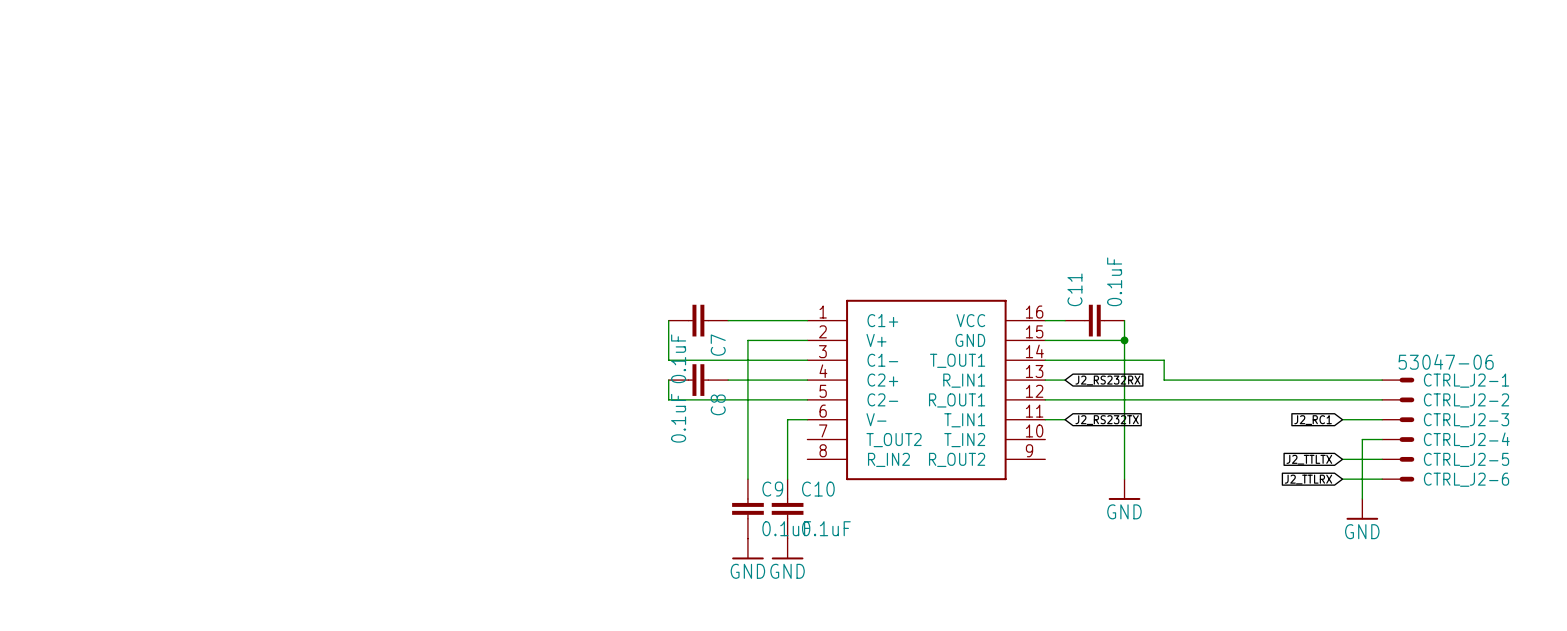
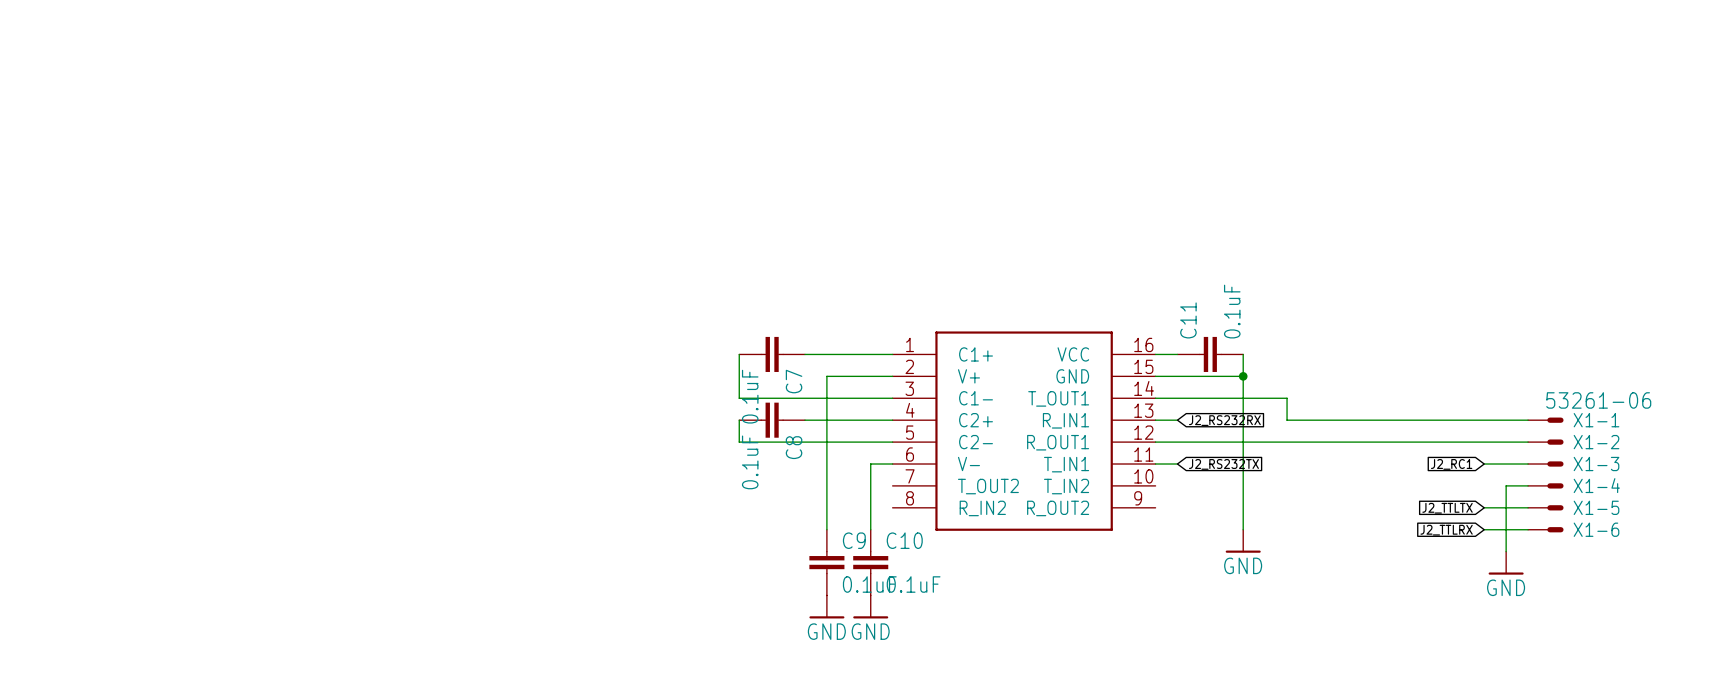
CTRL_J2-1 value: 53047-06 (1446, 361) -> 53261-06 (1598, 400)
CTRL_J2-1 name: CTRL_J2-1 (1466, 380) -> X1-1 (1596, 420)
CTRL_J2-2 name: CTRL_J2-2 (1466, 400) -> X1-2 (1596, 442)
CTRL_J2-3 name: CTRL_J2-3 (1466, 420) -> X1-3 (1596, 464)
CTRL_J2-4 name: CTRL_J2-4 (1466, 439) -> X1-4 (1596, 485)
CTRL_J2-5 name: CTRL_J2-5 (1466, 459) -> X1-5 (1596, 507)
CTRL_J2-6 name: CTRL_J2-6 (1466, 479) -> X1-6 (1596, 529)

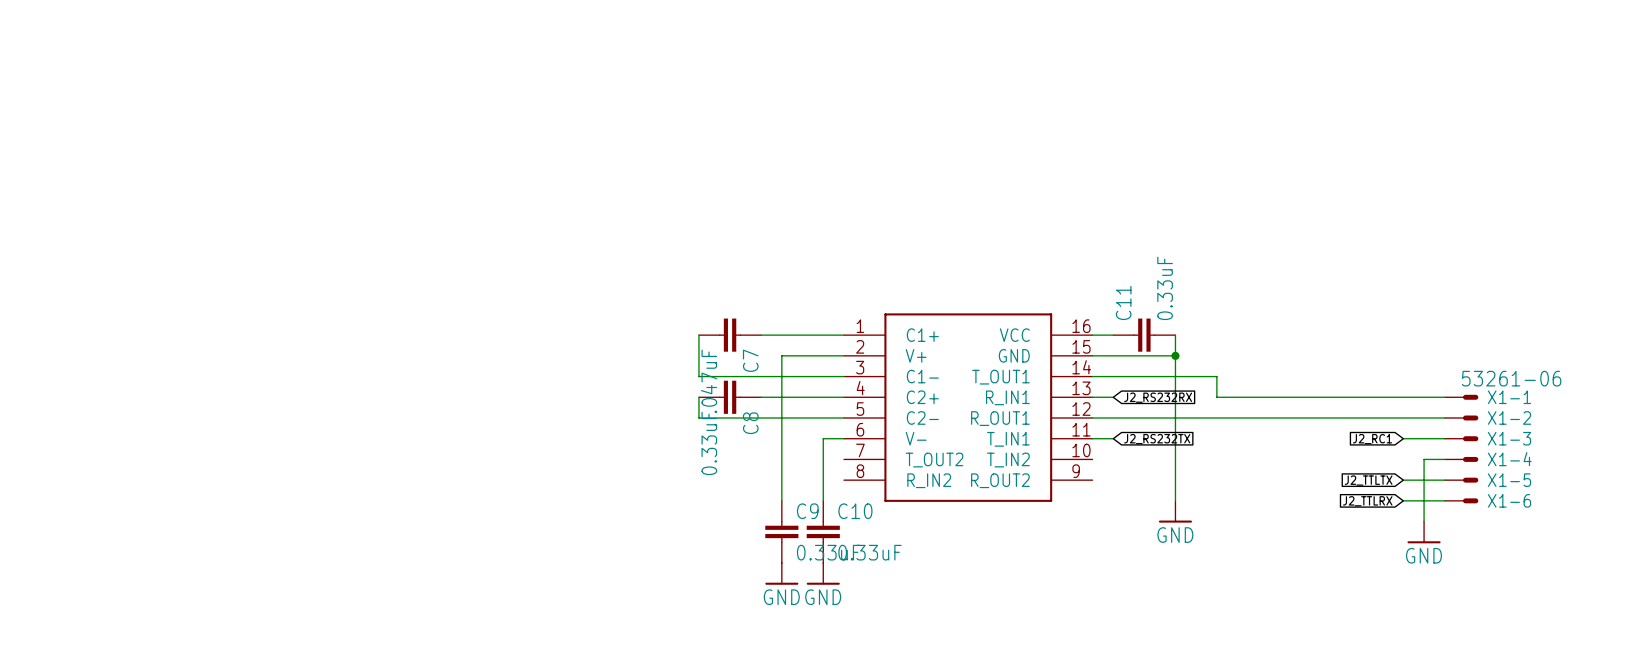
C11 value: 0.1uF (1232, 311) -> 0.33uF (1165, 288)
C7 value: 0.1uF (750, 396) -> .047uF (708, 381)
C8 value: 0.1uF (750, 462) -> 0.33uF (709, 443)
C9 value: 0.1uF (869, 584) -> 0.33uF (828, 552)
C10 value: 0.1uF (913, 584) -> 0.33uF (870, 552)

